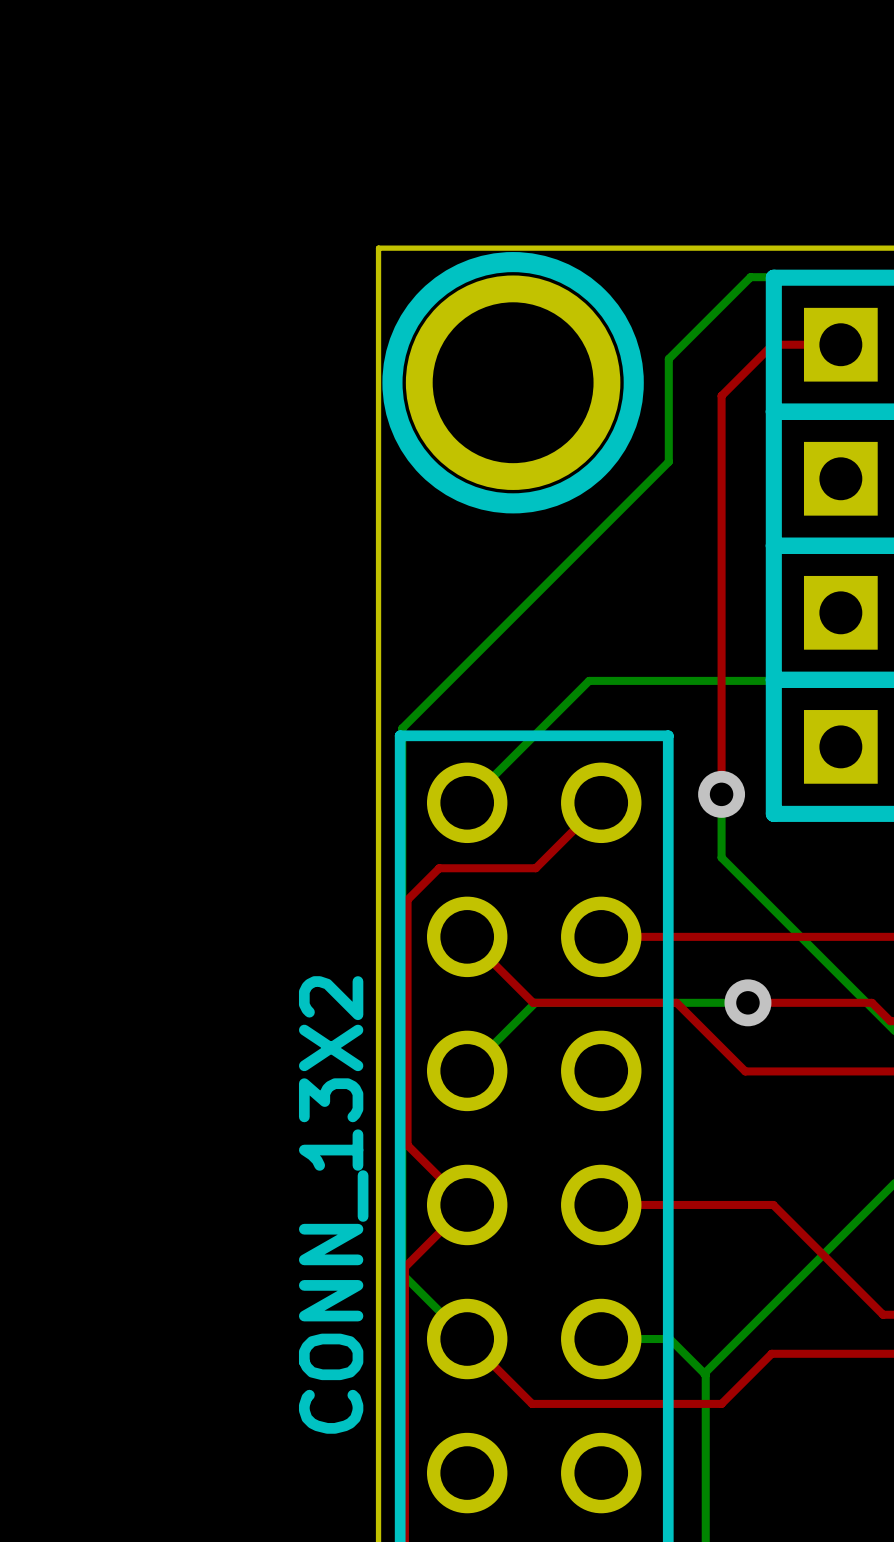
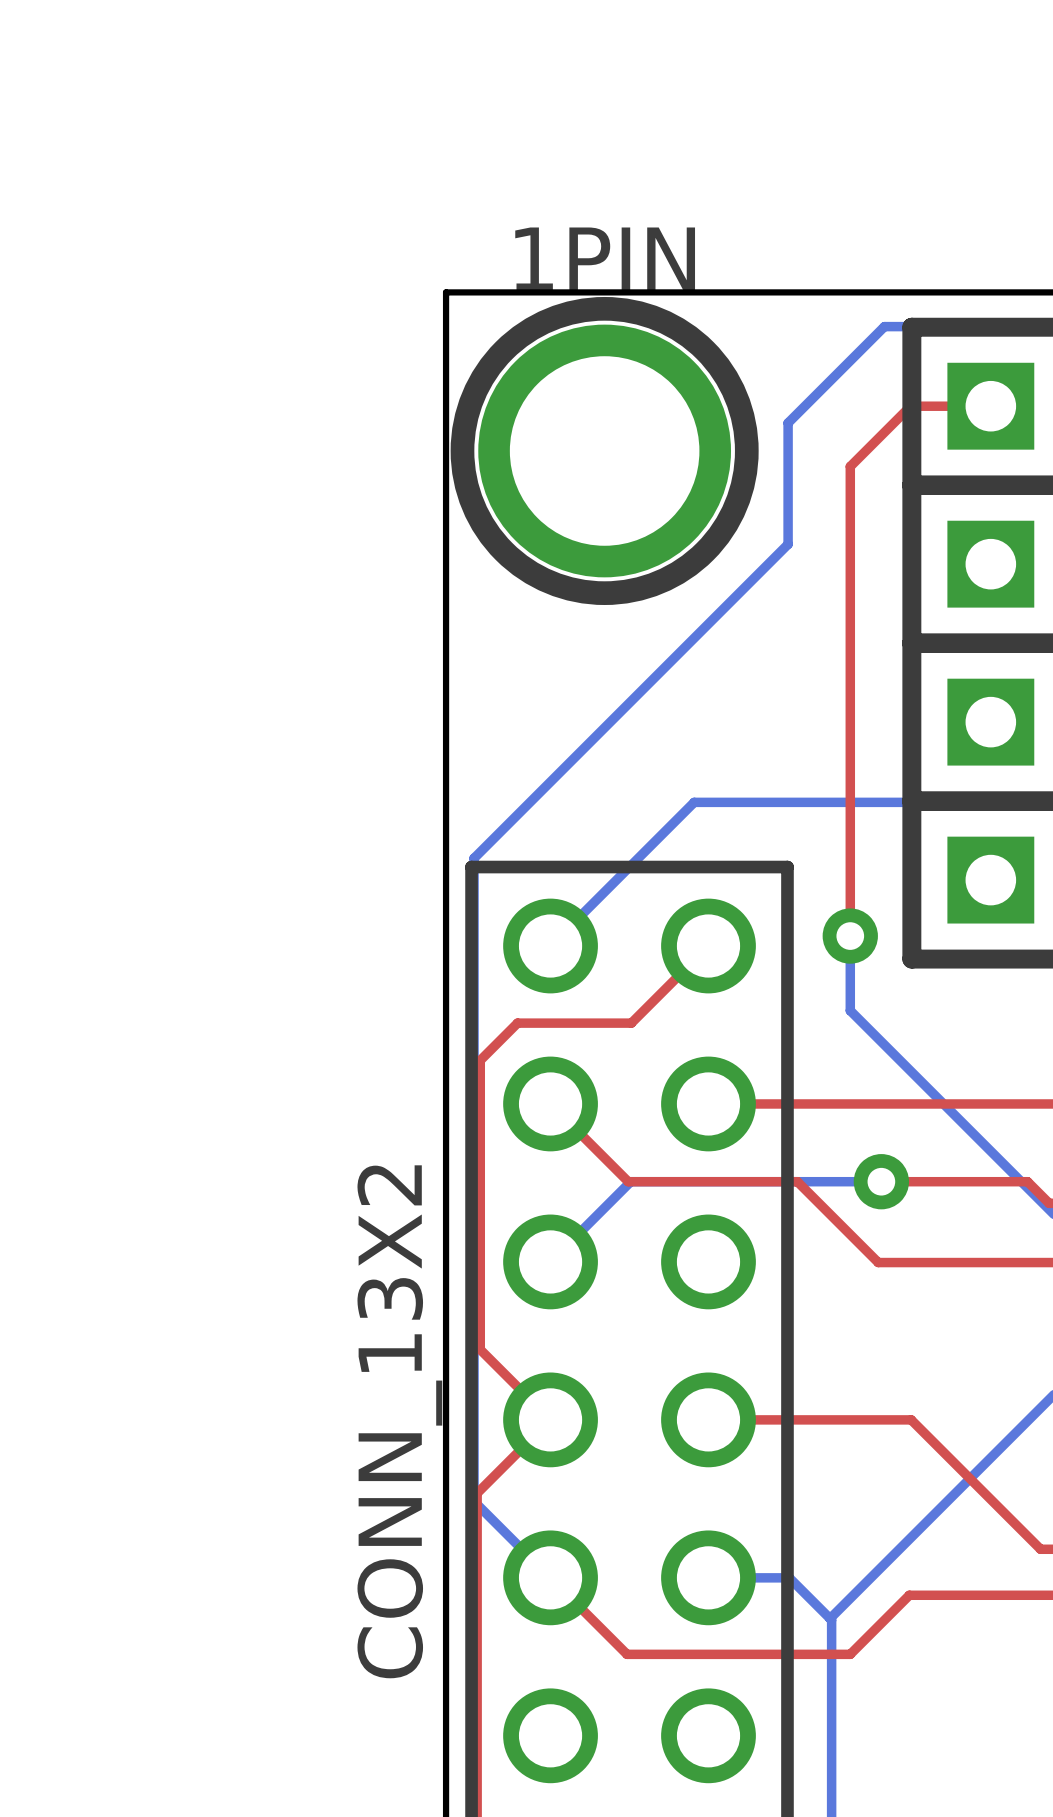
1PIN name: none -> 1PIN (605, 259)

